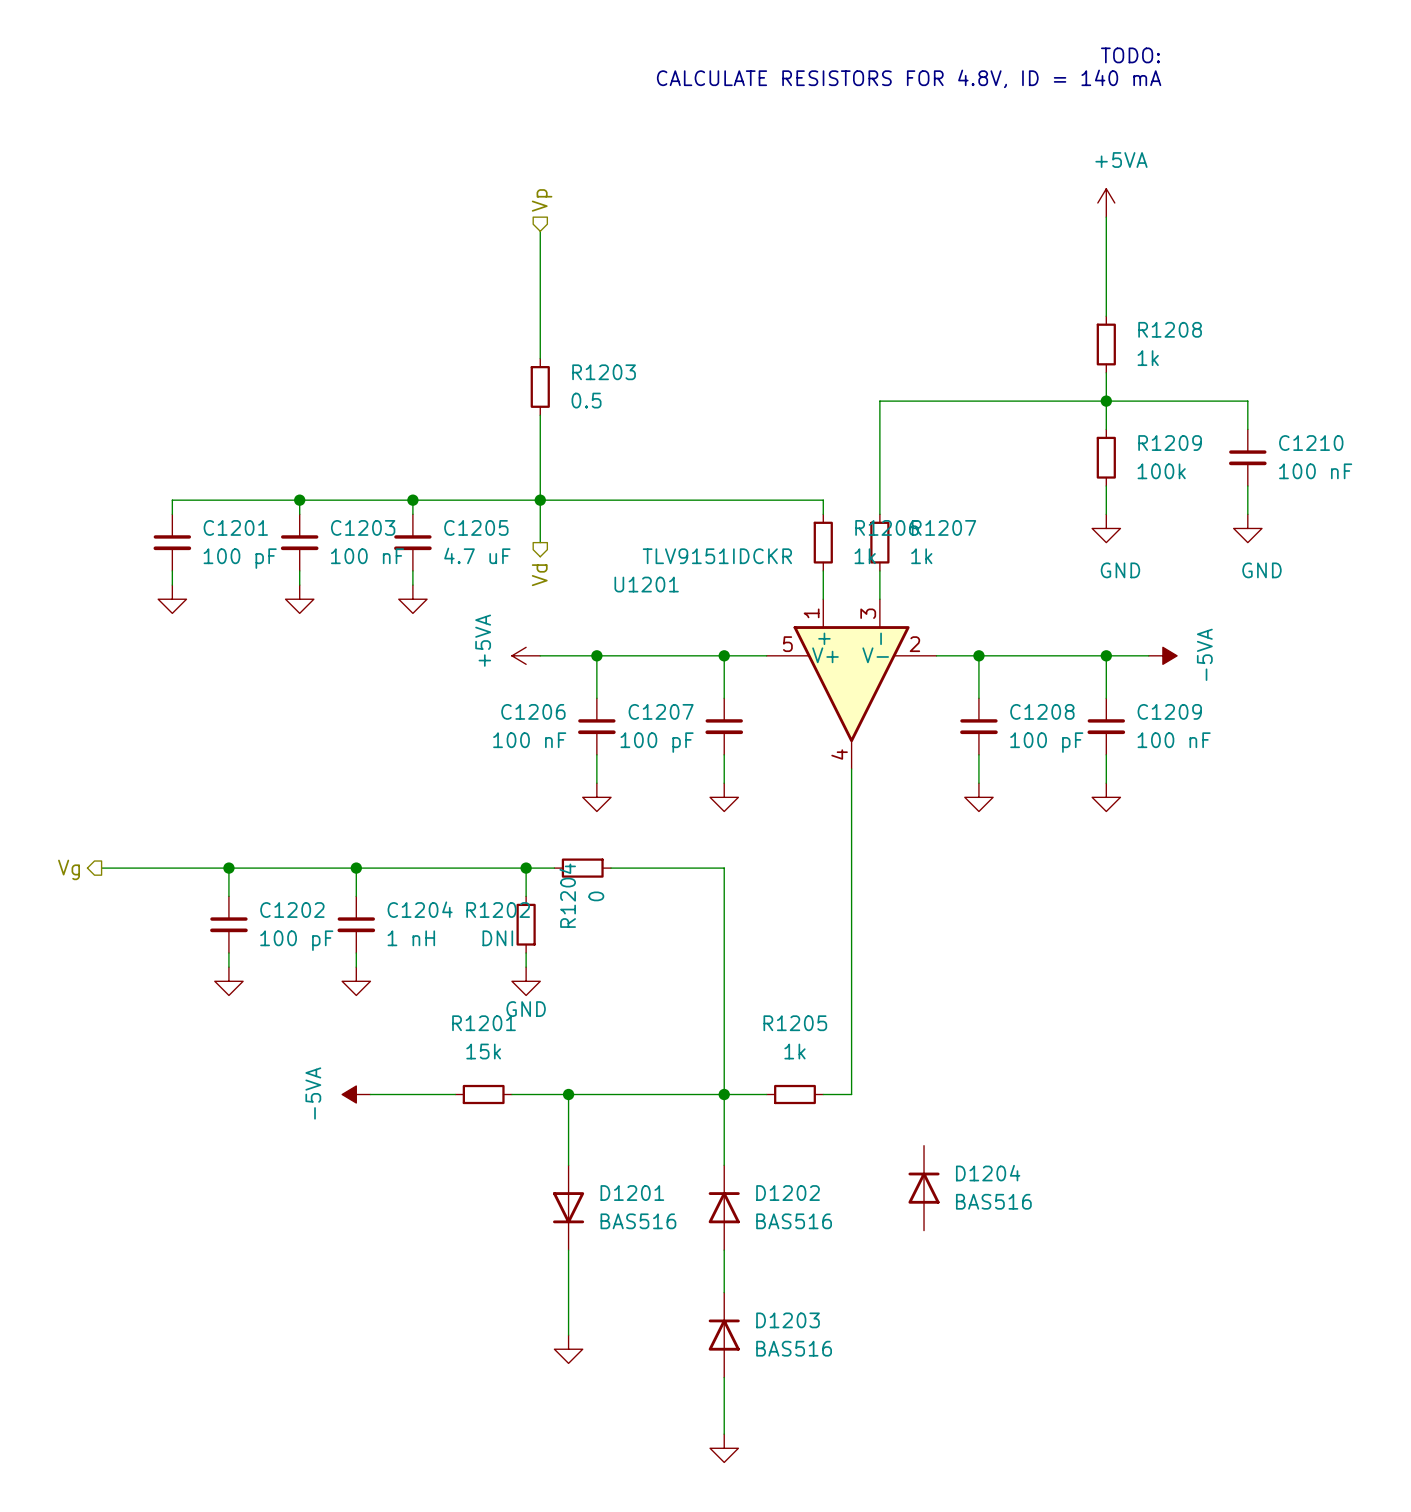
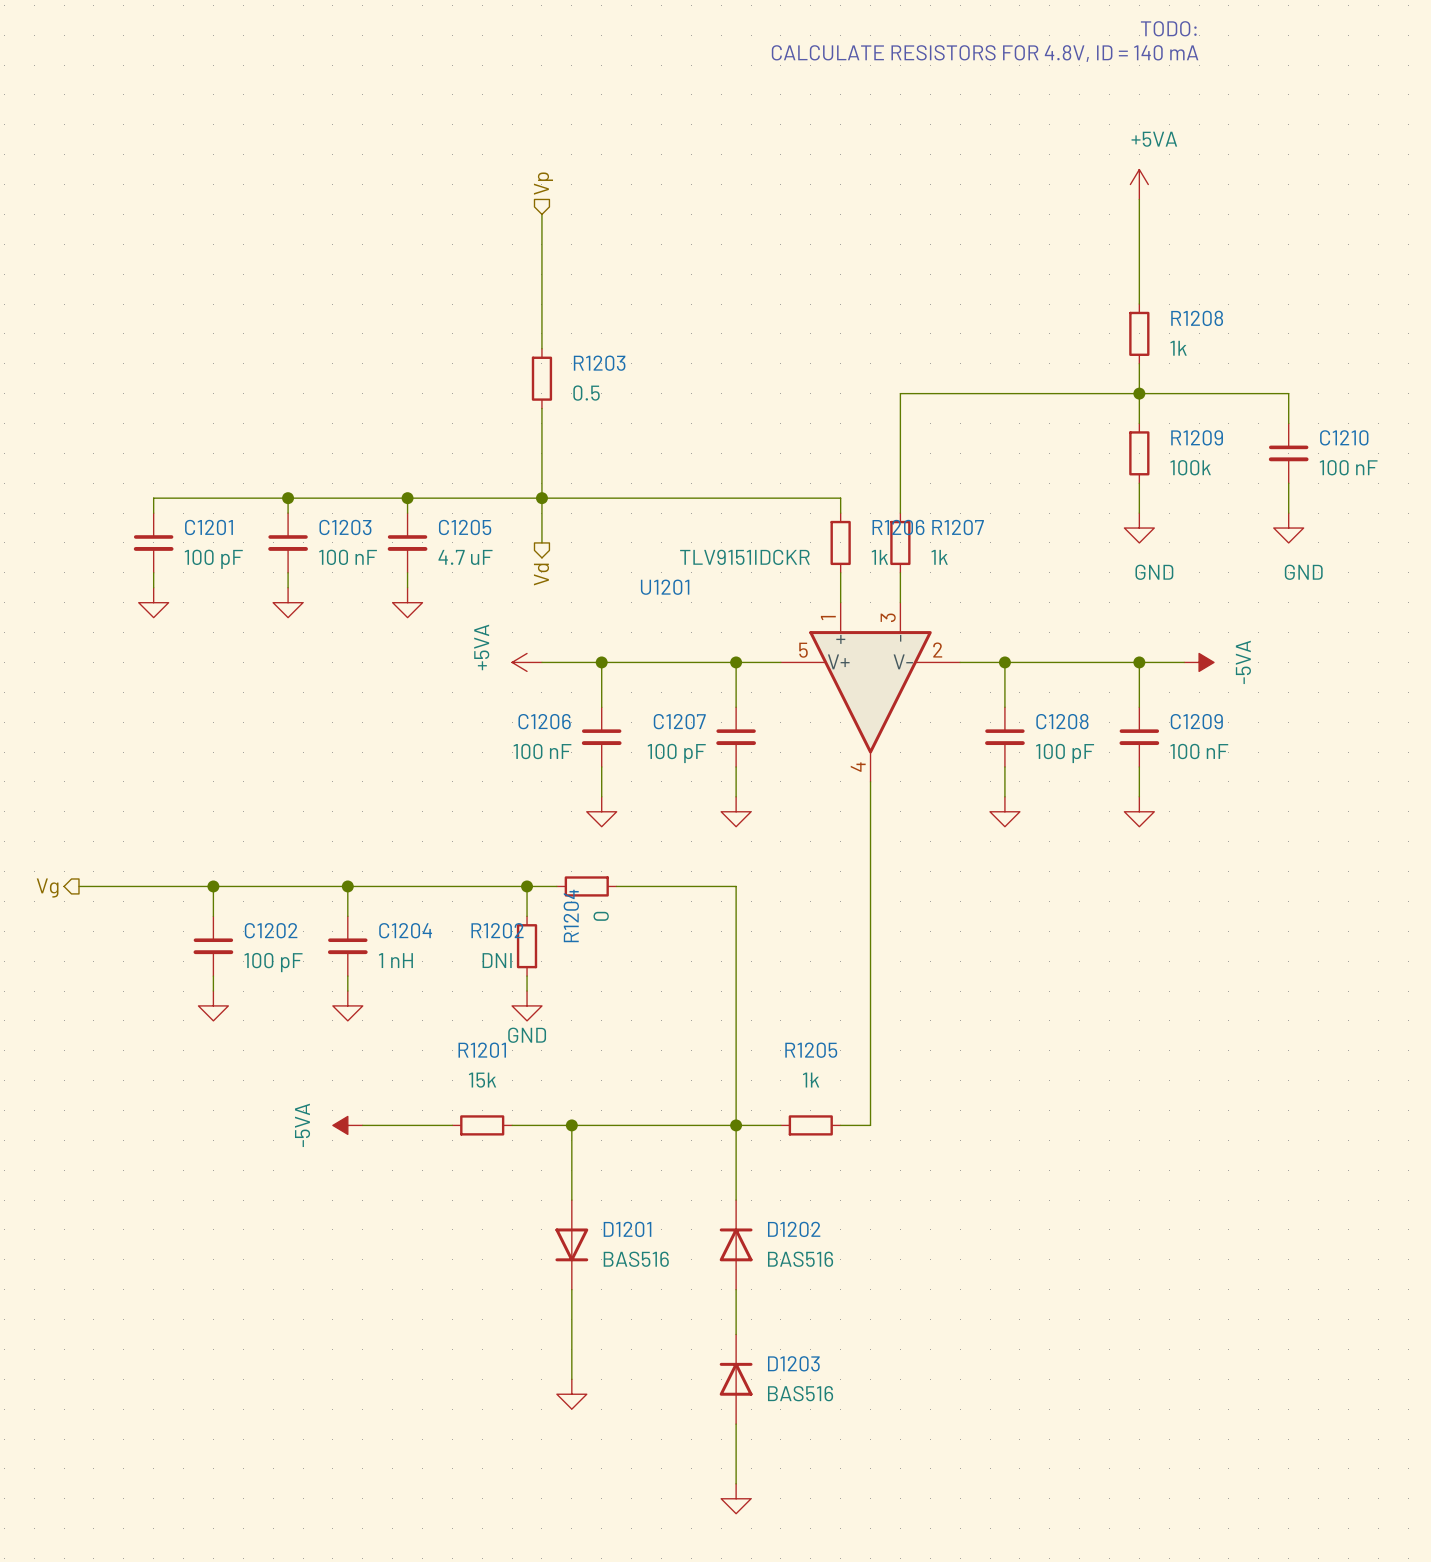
D1204: BAS516 (924, 1188) -> none

